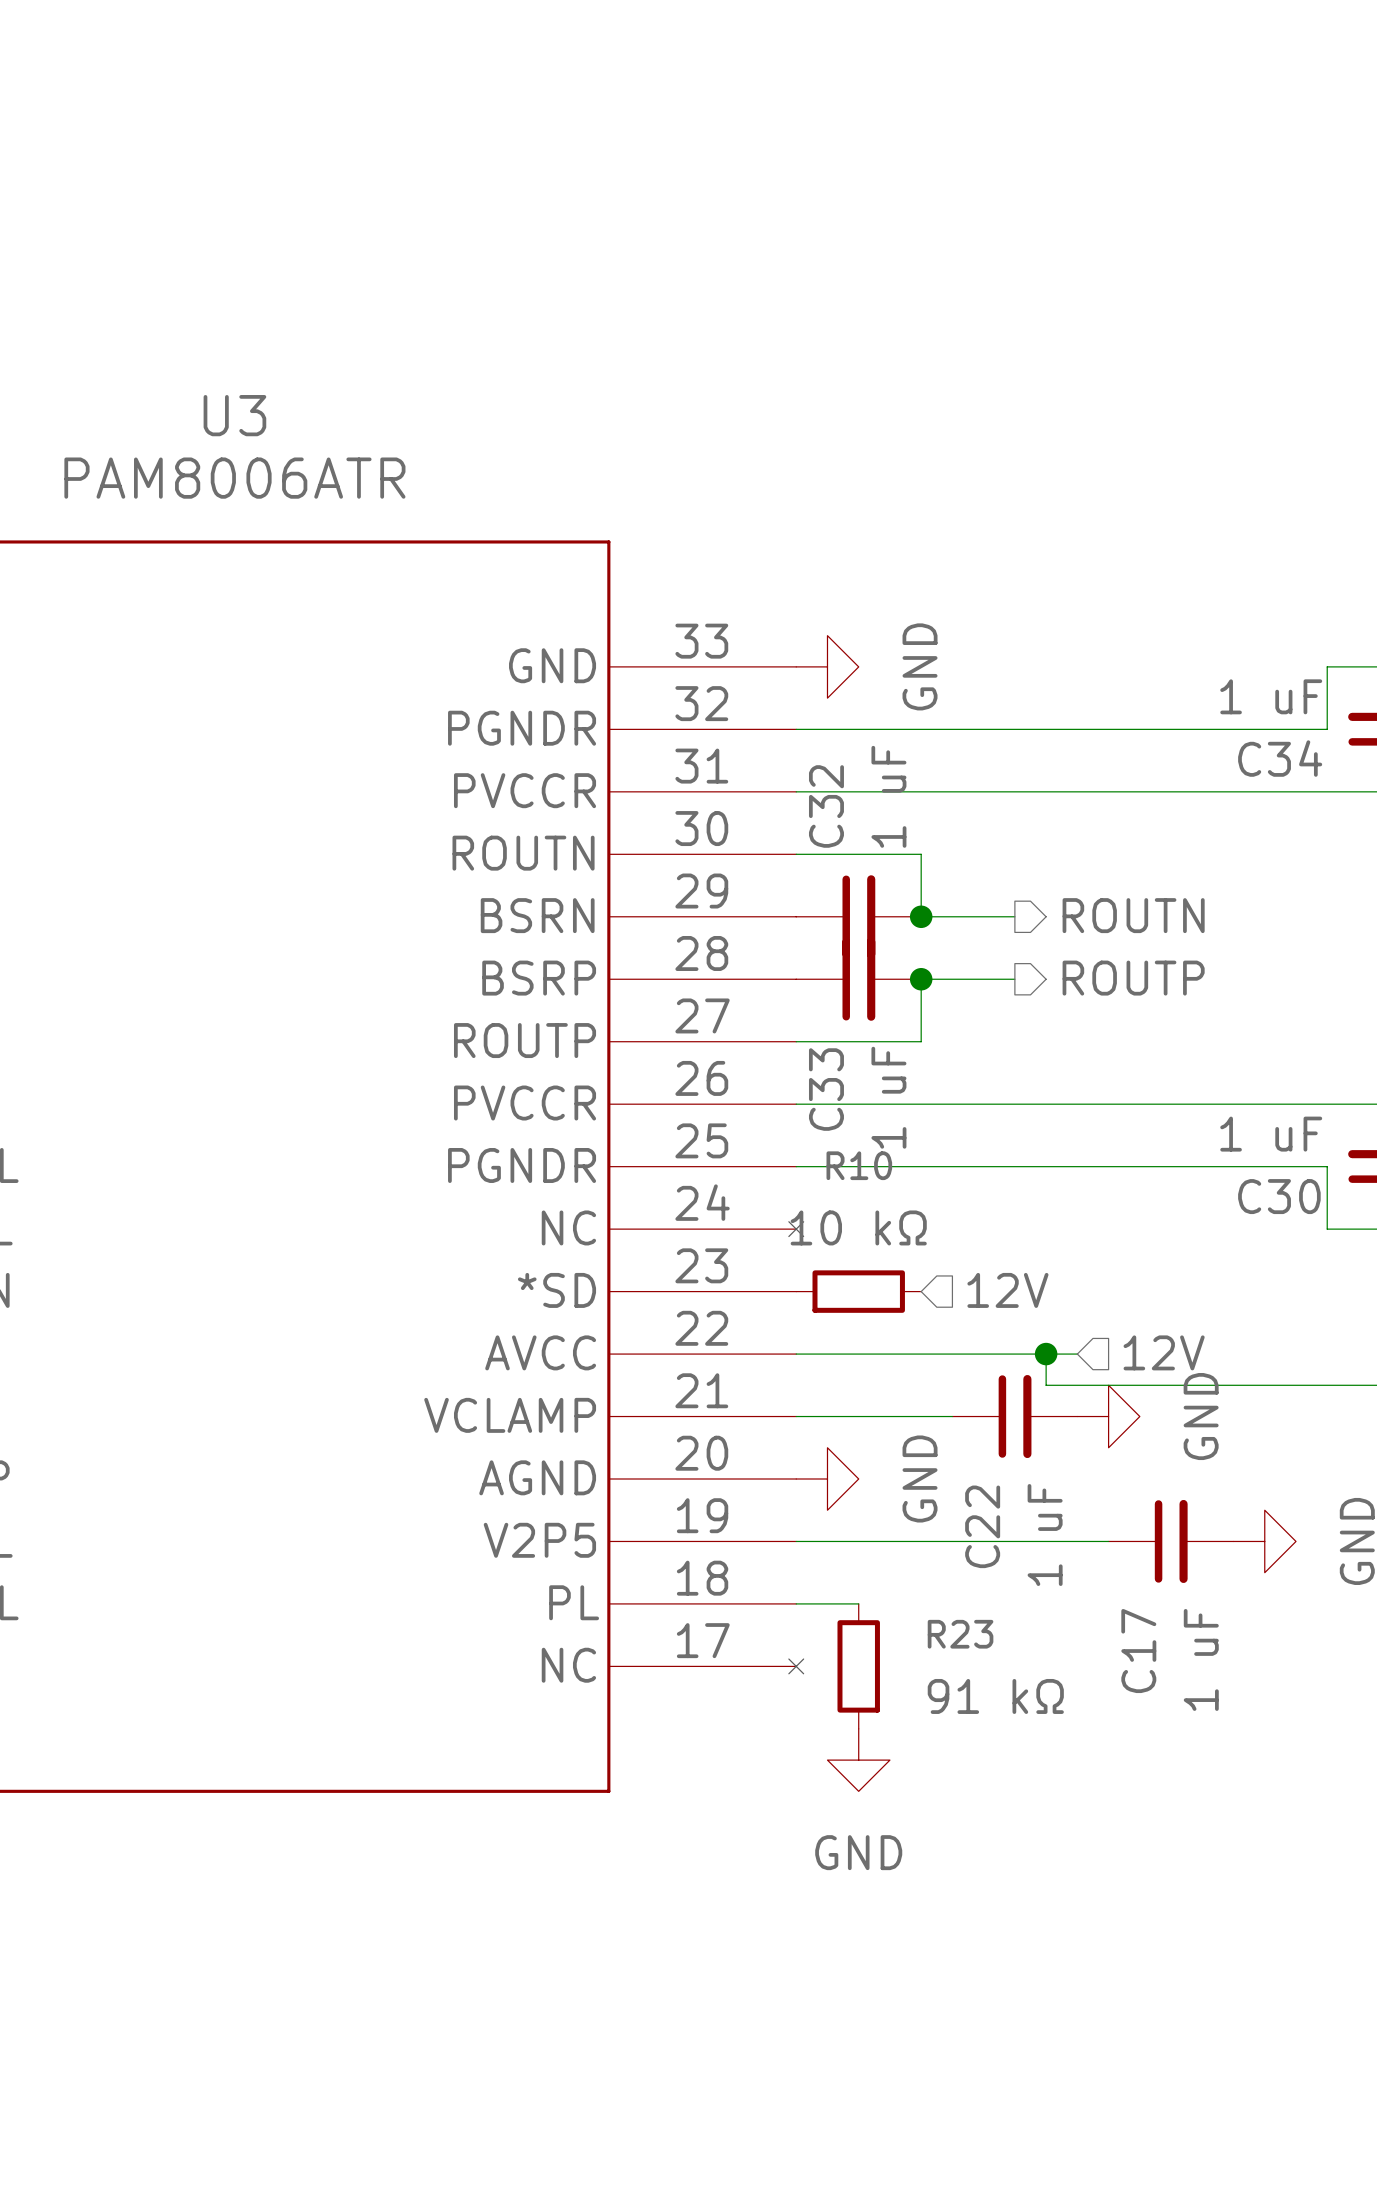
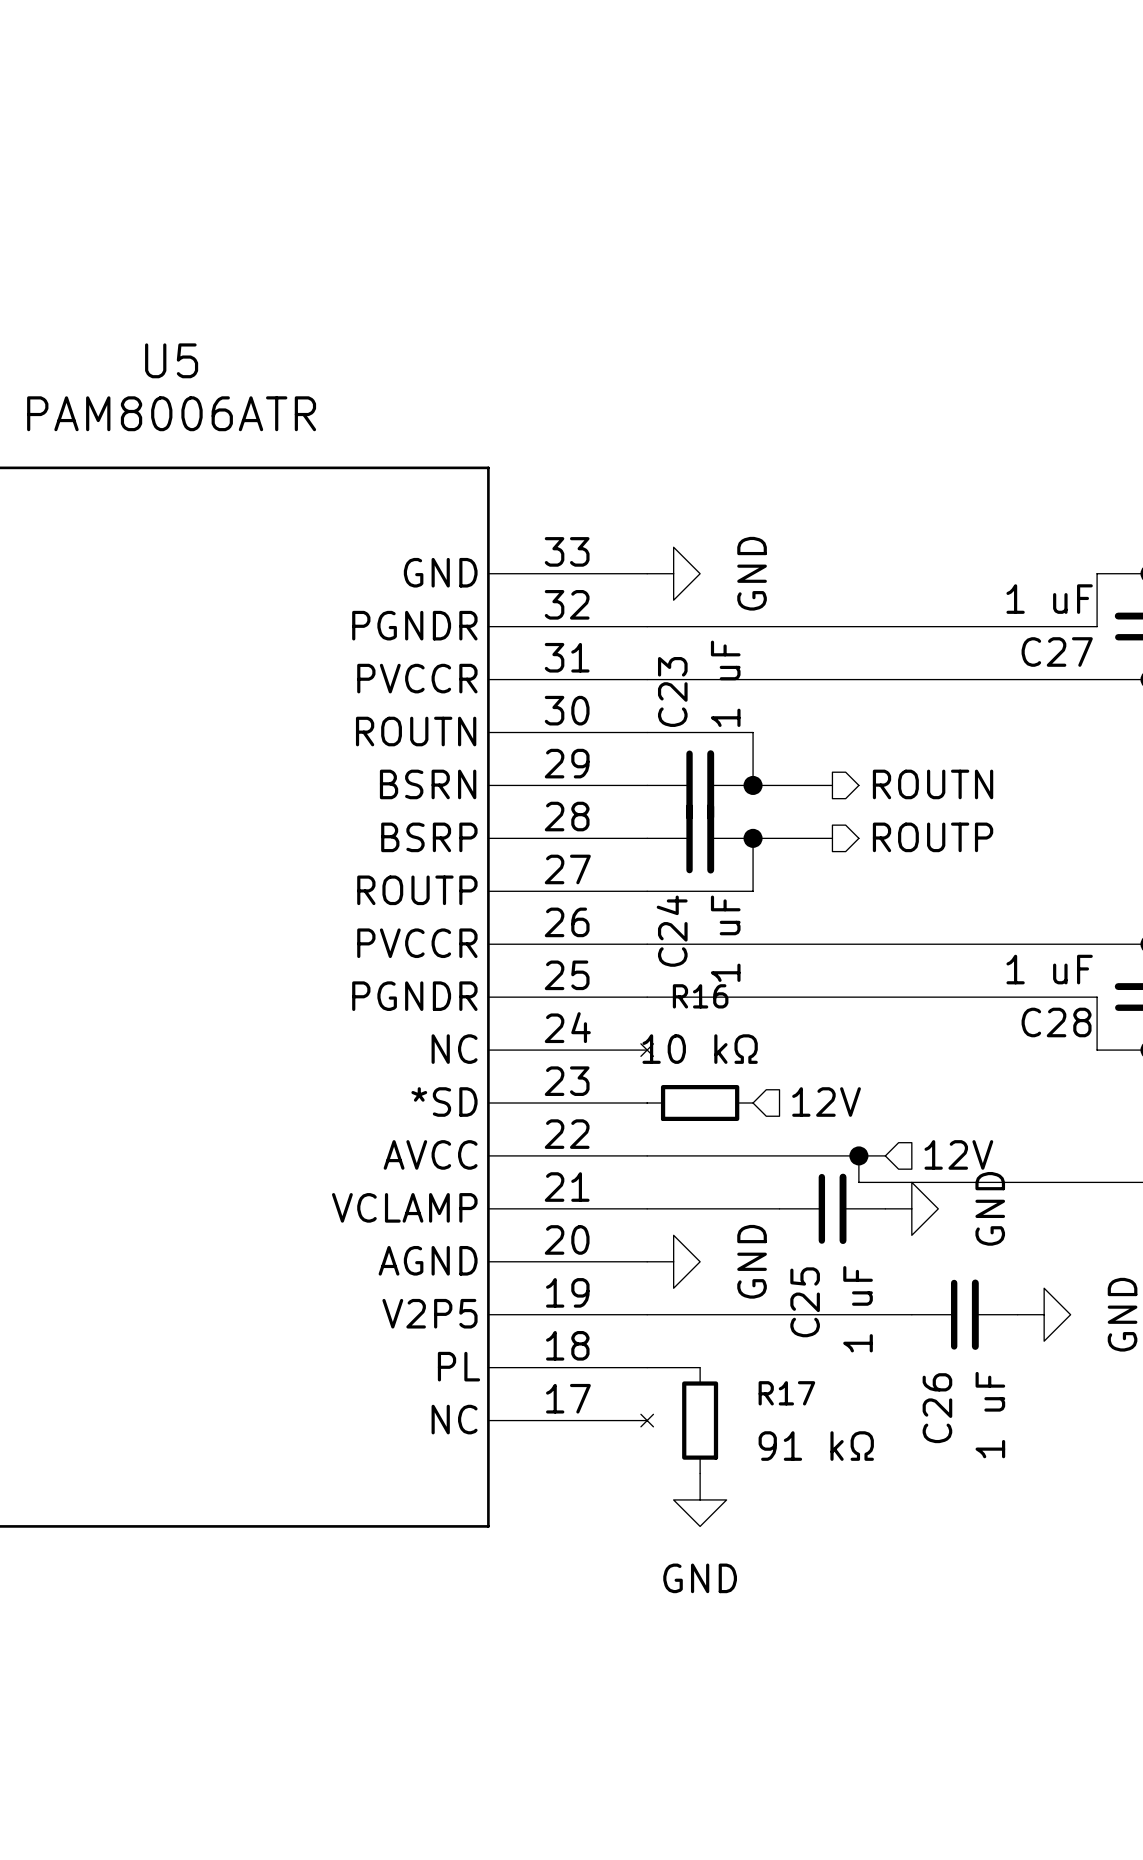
U3 name: U3 (234, 415) -> U5 (171, 360)
C34 name: C34 (1280, 758) -> C27 (1057, 651)
C32 name: C32 (826, 806) -> C23 (672, 691)
C33 name: C33 (826, 1089) -> C24 (672, 931)
R10 name: R10 (859, 1165) -> R16 (700, 996)
C30 name: C30 (1279, 1196) -> C28 (1056, 1022)
C22 name: C22 (982, 1526) -> C25 (805, 1302)
R23 name: R23 (960, 1634) -> R17 (786, 1393)
C17 name: C17 (1138, 1651) -> C26 (937, 1408)

